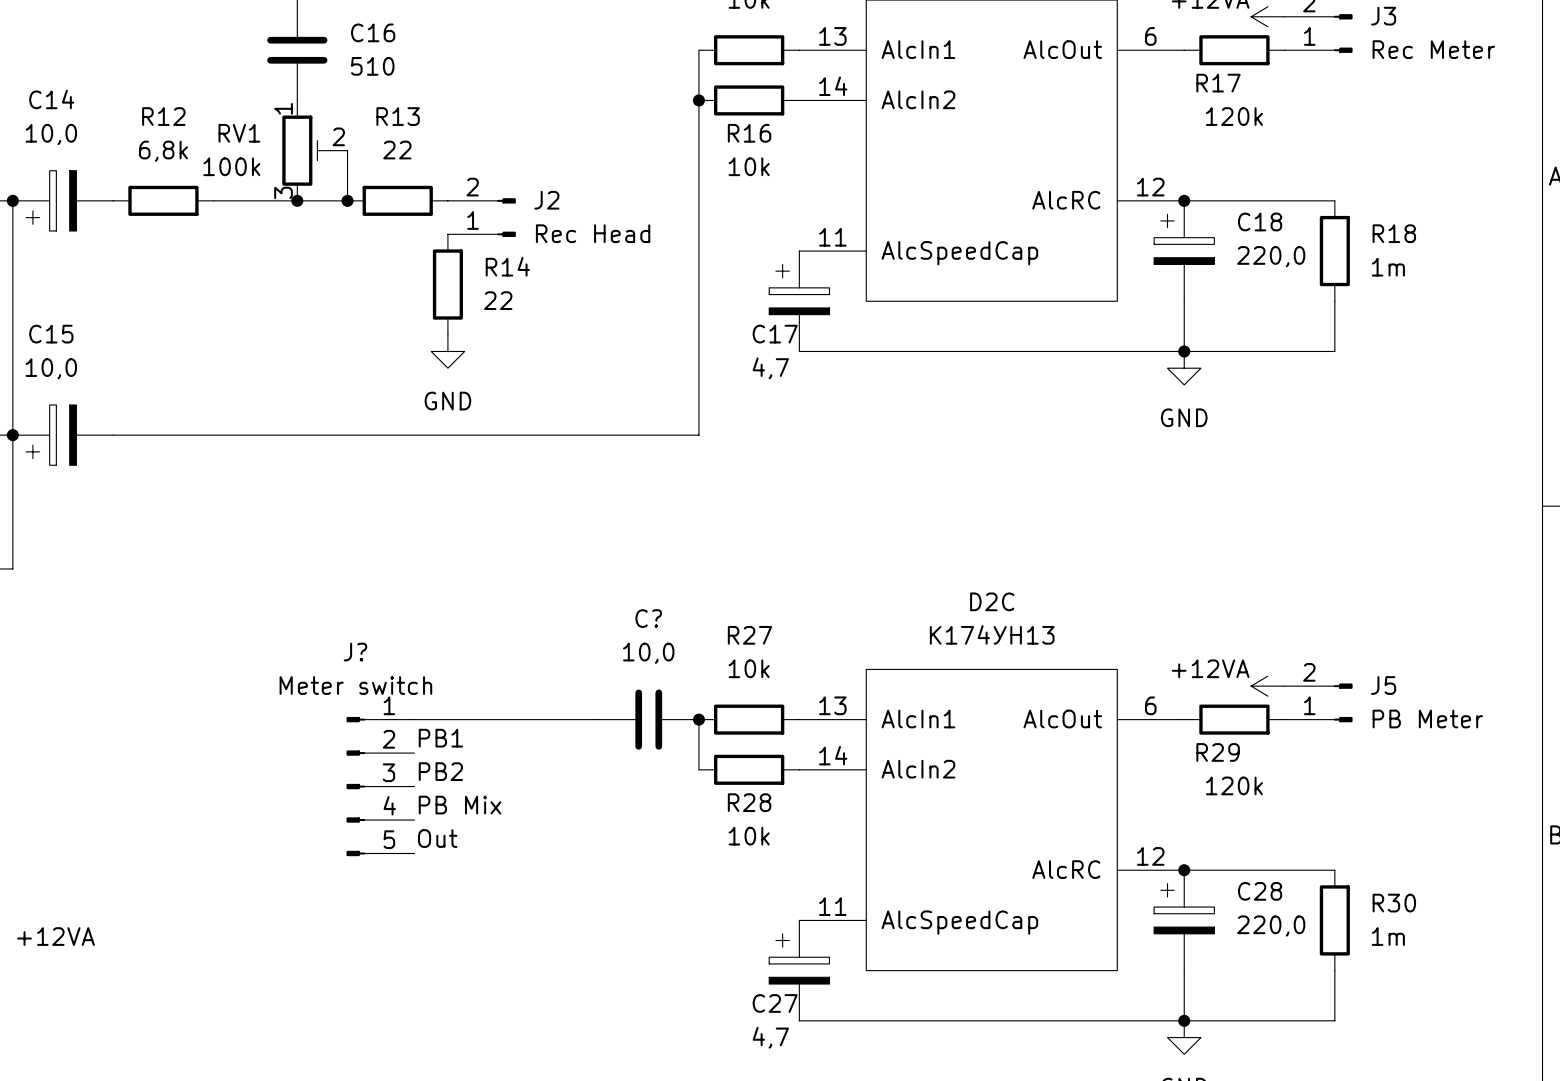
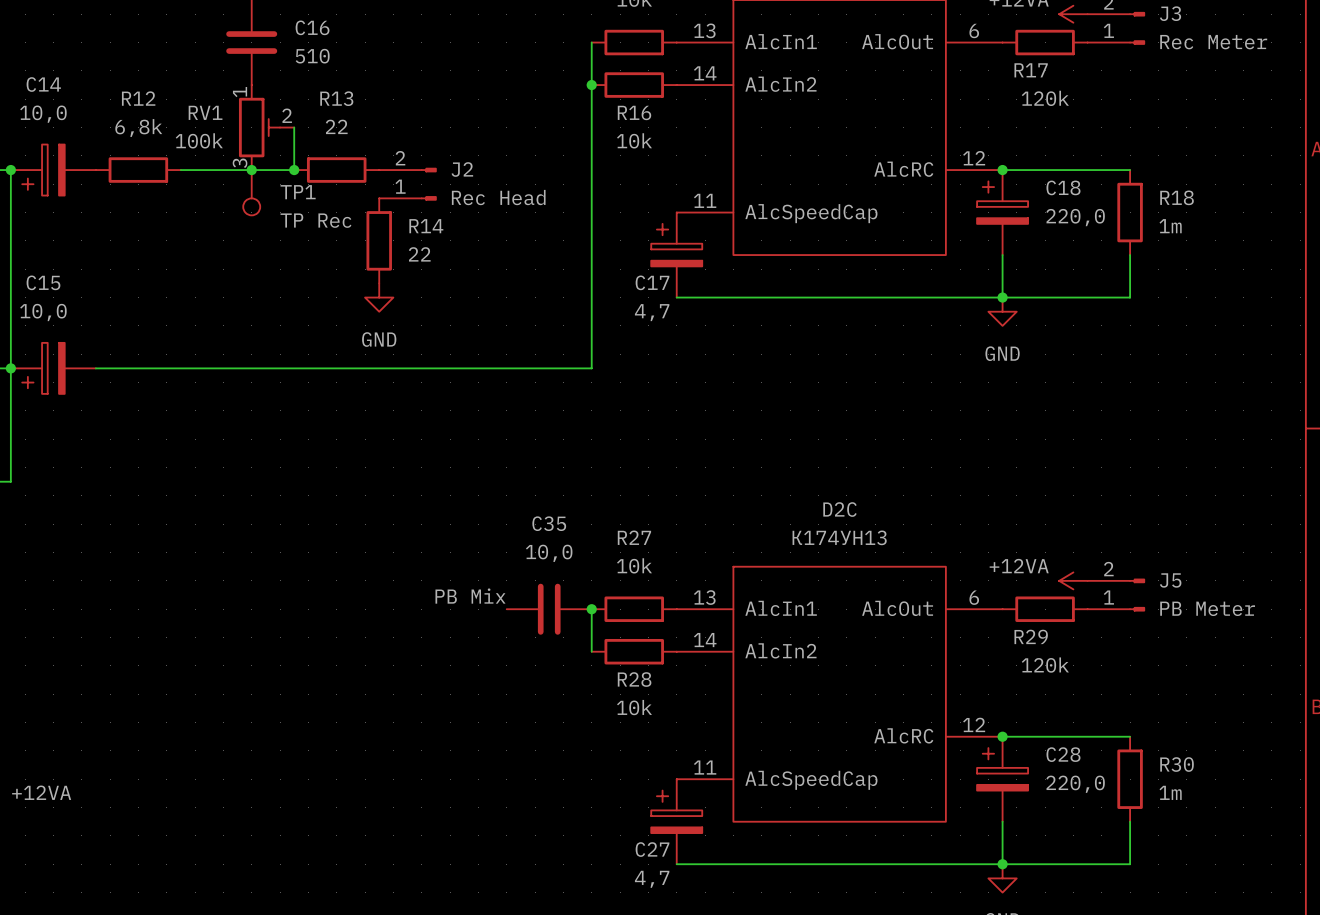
TP1: none -> TP Rec (251, 192)
C? name: C? (648, 618) -> C35 (549, 523)
wire: (414, 719) (598, 719) -> none
label: PB1 (440, 738) -> none
label: PB2 (440, 771) -> none
J?: Meter switch (380, 786) -> none
label position: PB Mix (460, 805) -> PB Mix (470, 596)
label: Out (437, 838) -> none

